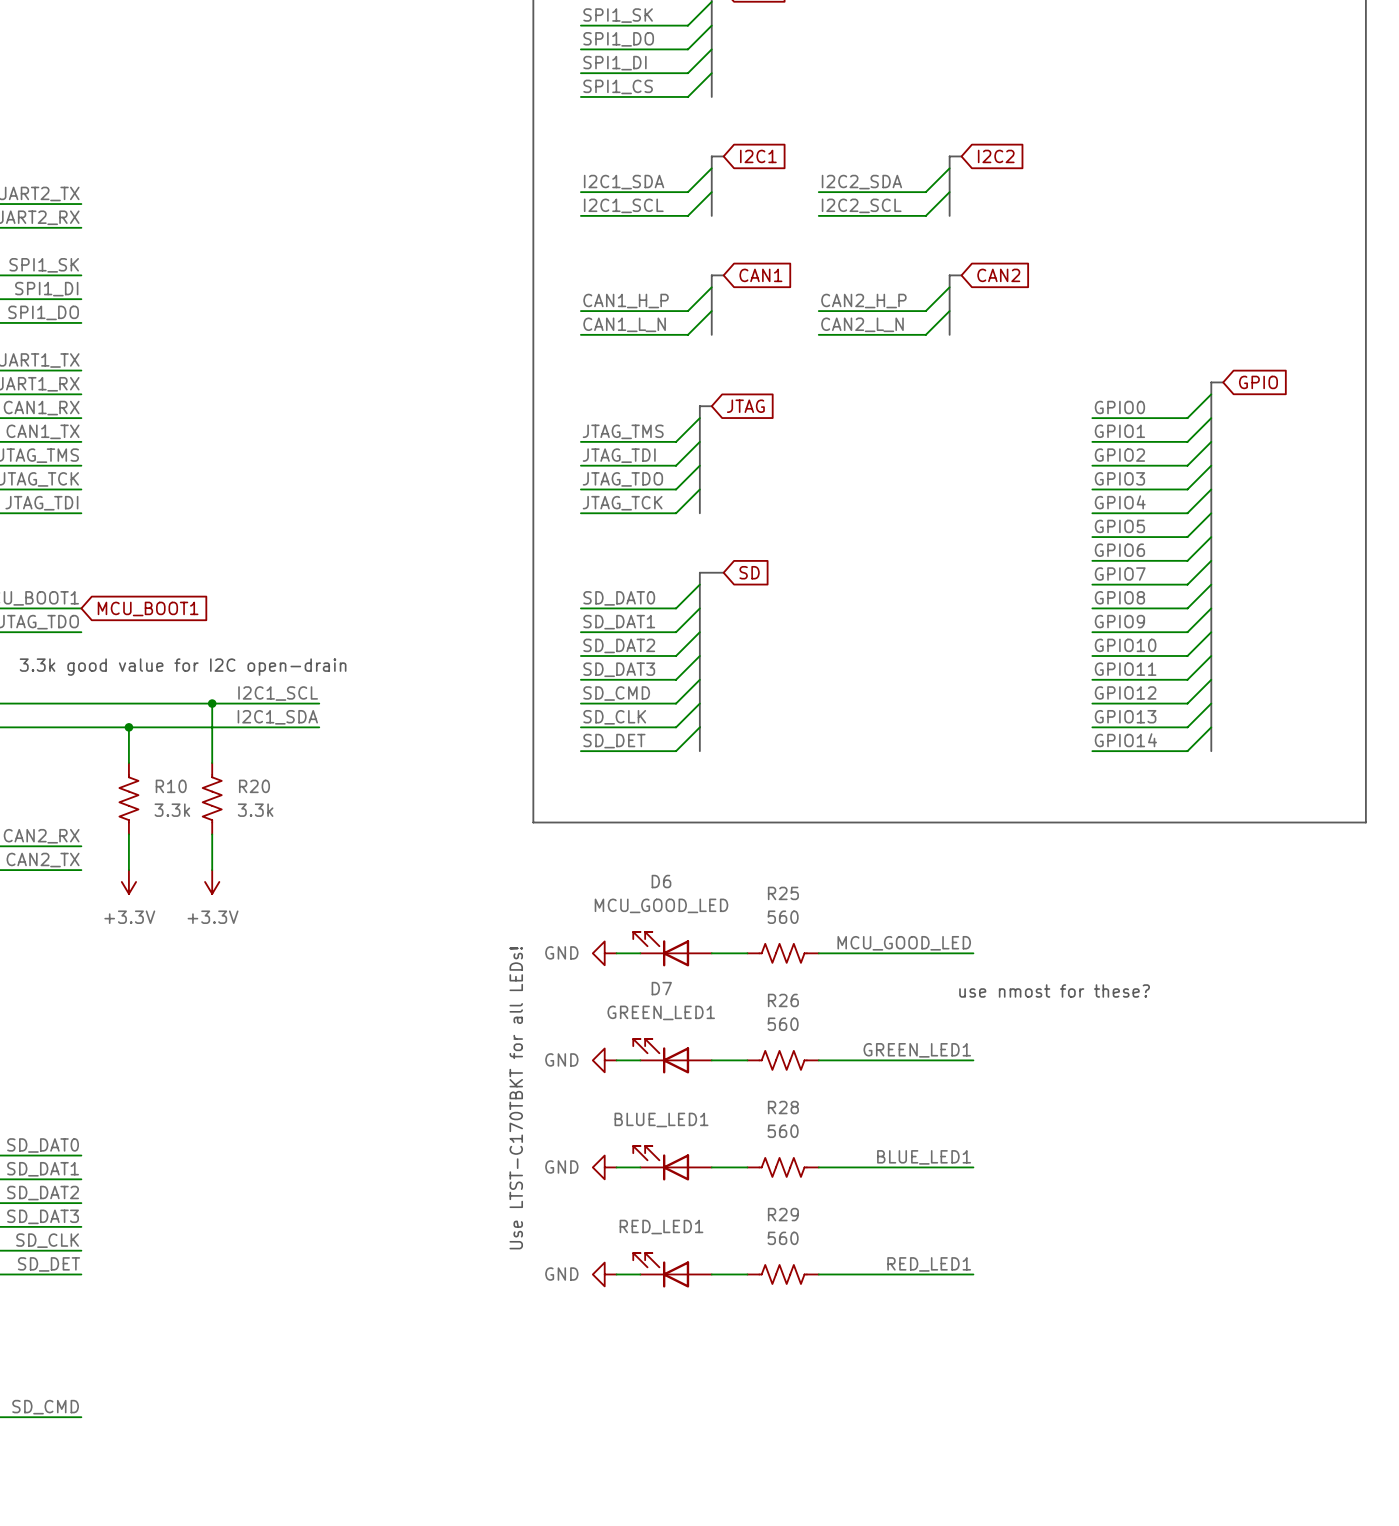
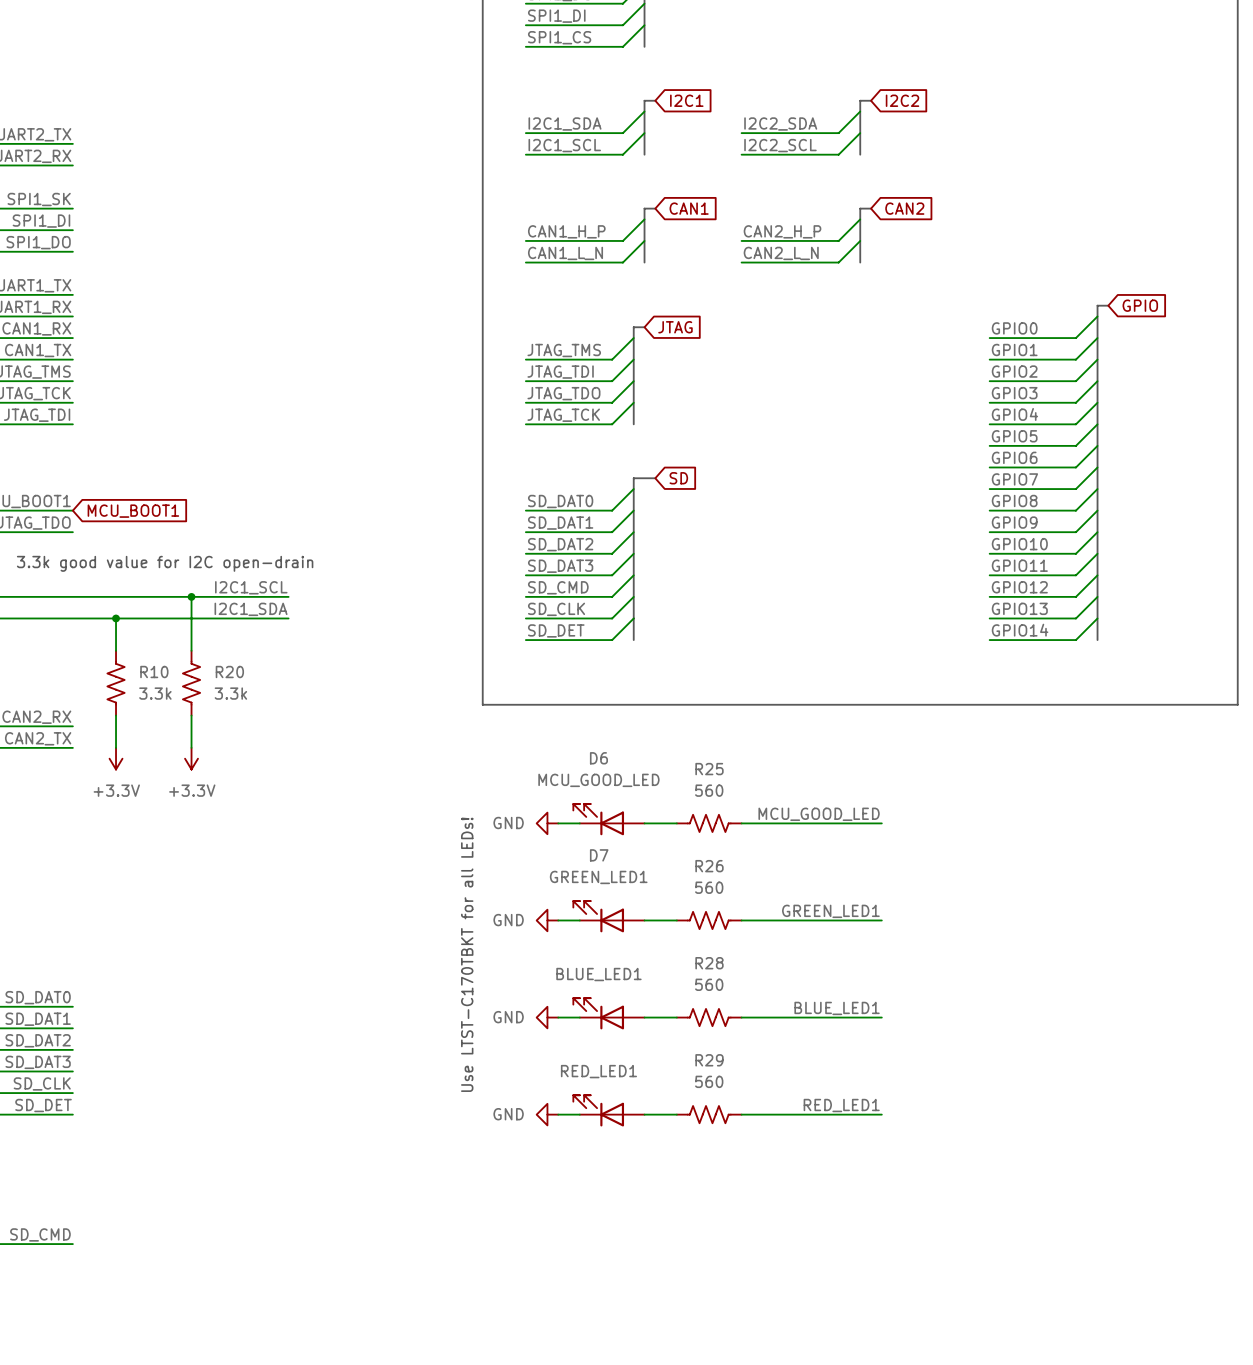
text: use nmost for these? (1054, 990) -> none

